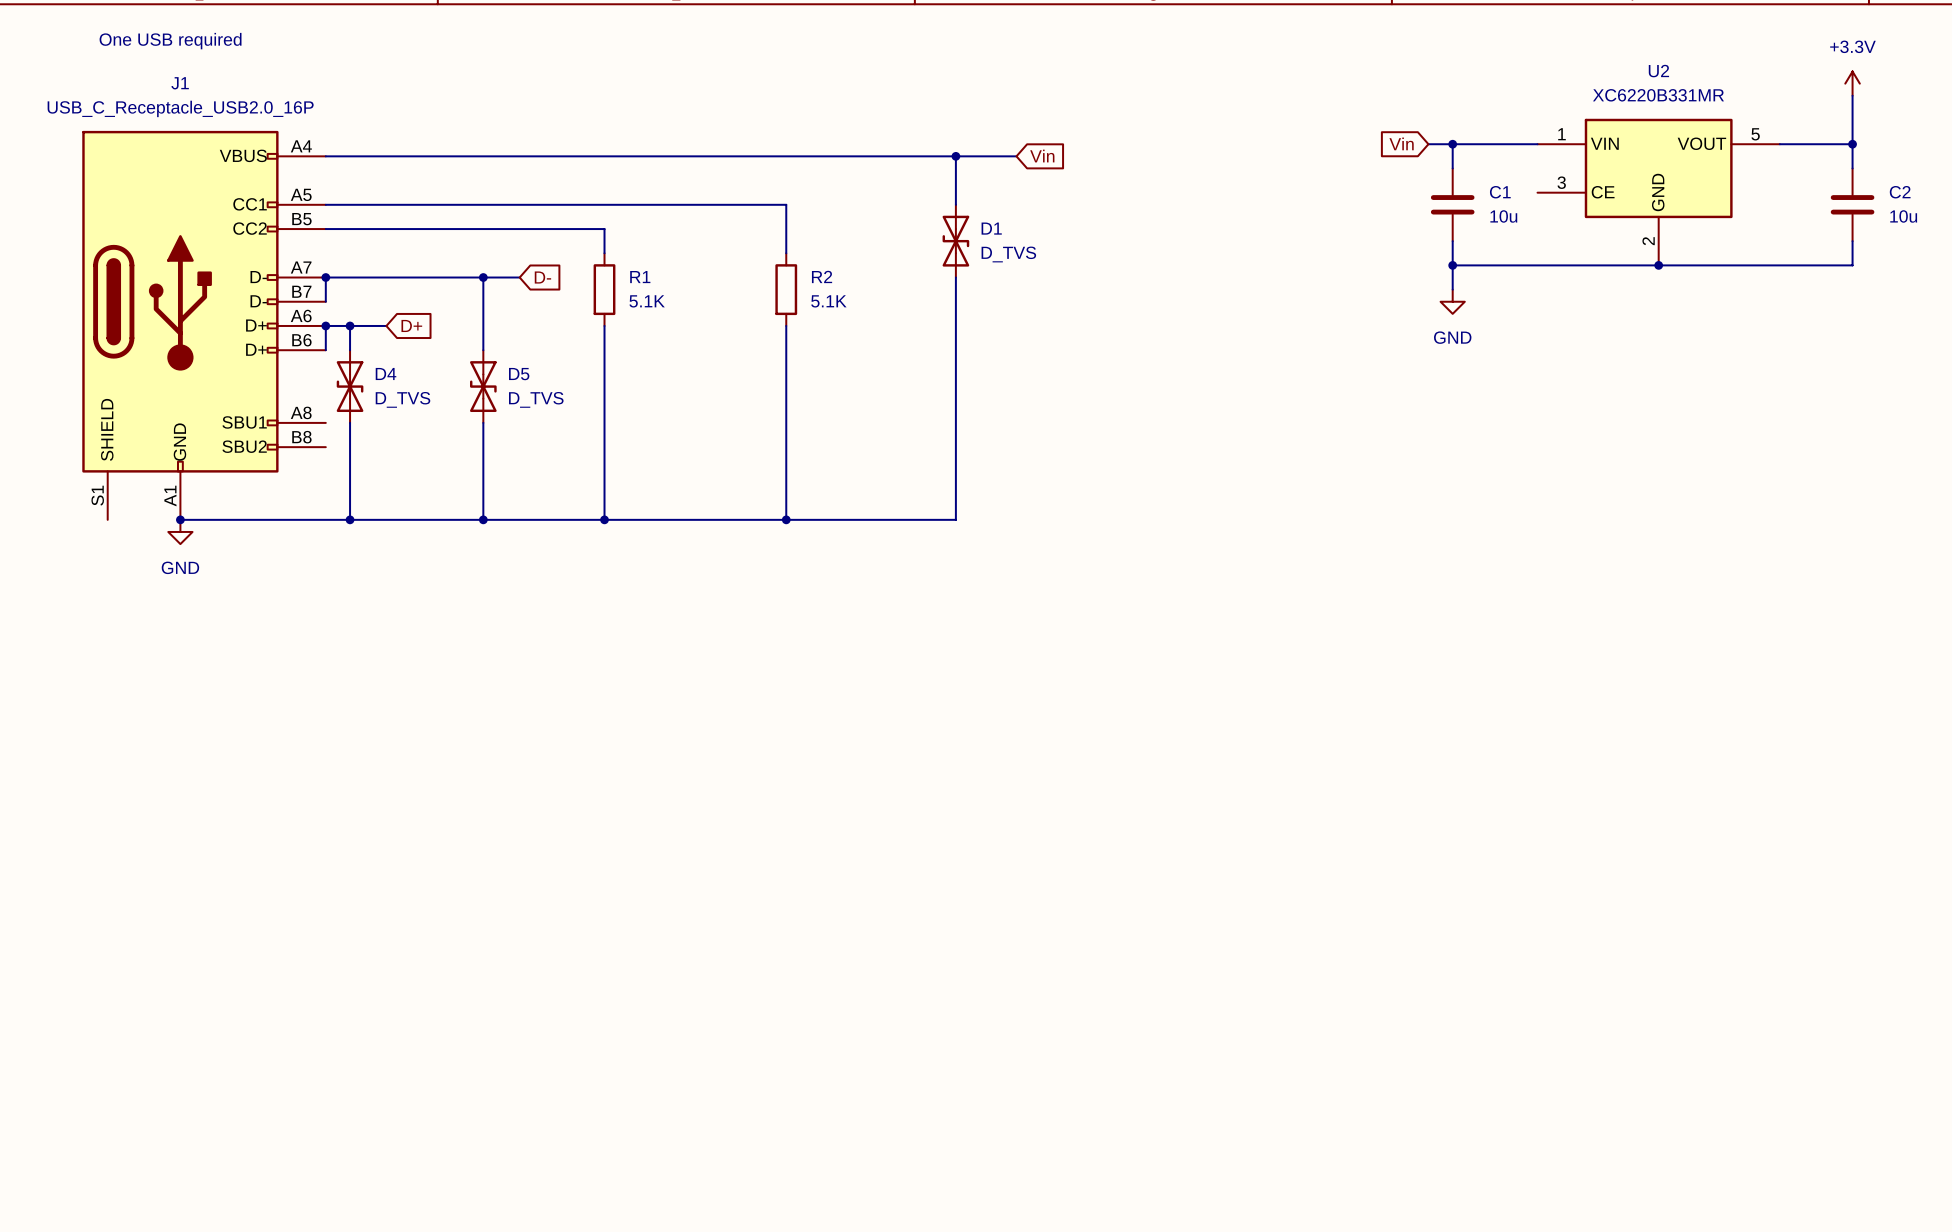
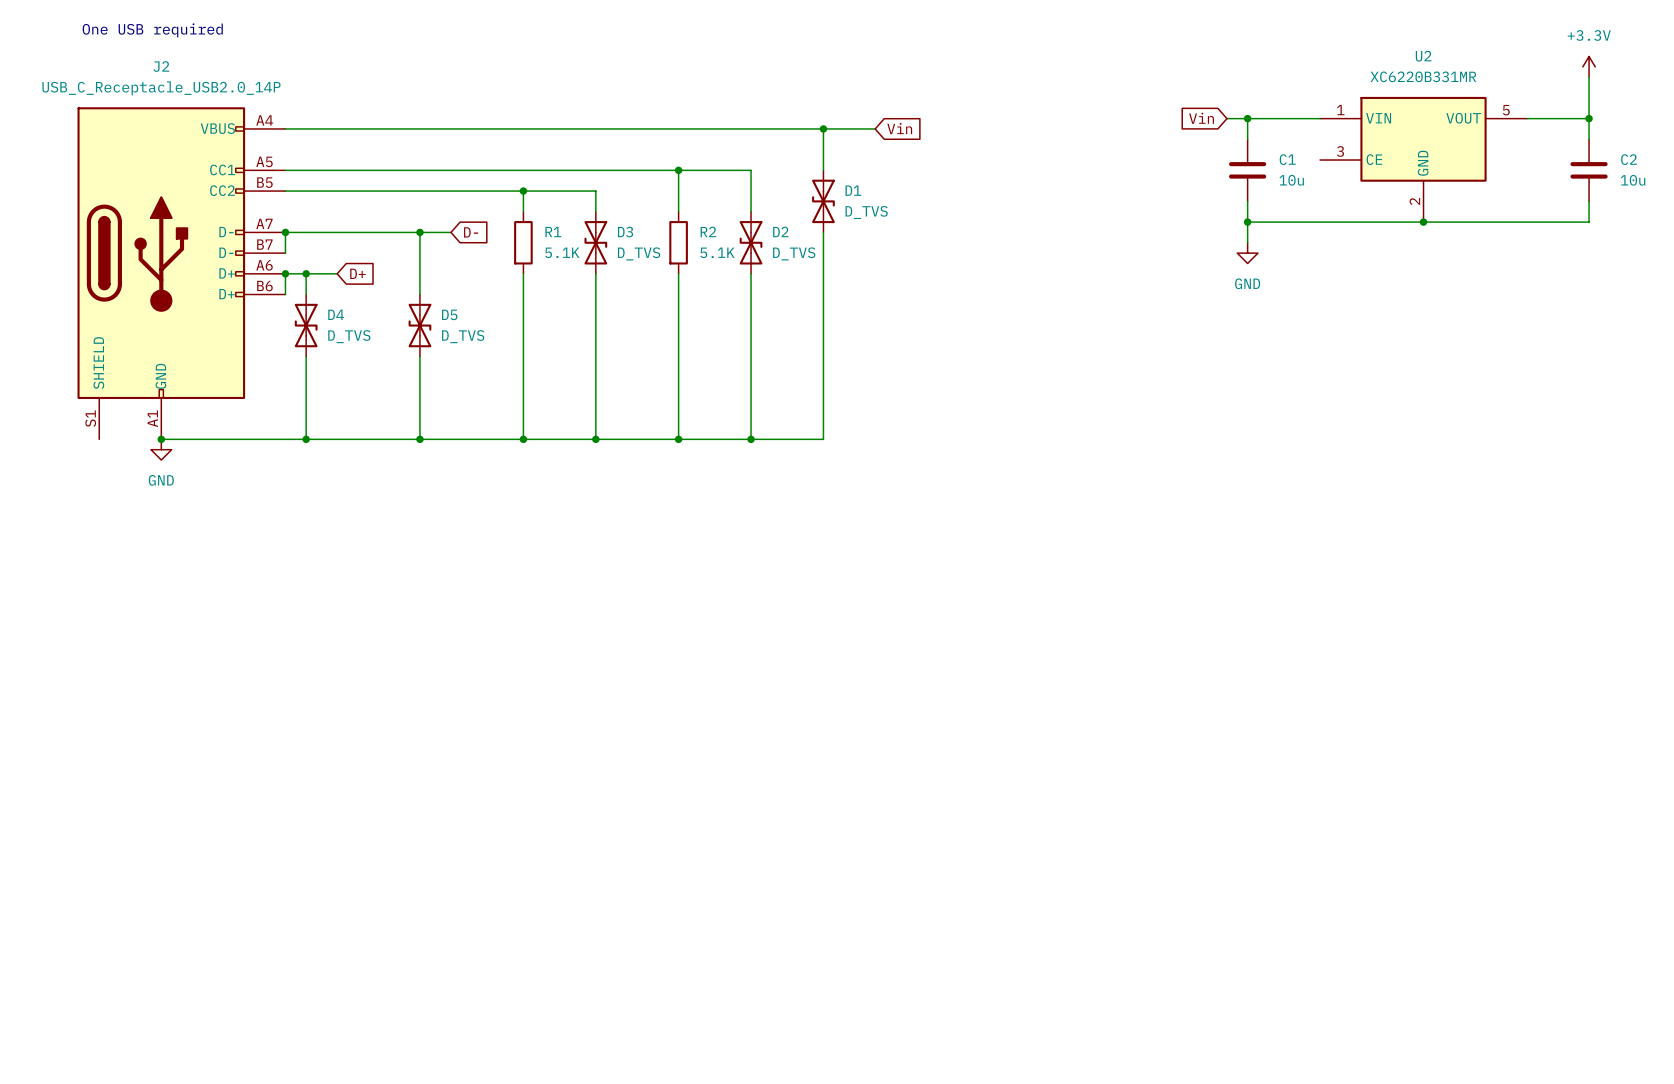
wire: none -> (678, 170) (751, 170) (751, 211)
junction: none -> (678, 170)
wire: none -> (523, 191) (595, 191) (595, 211)
junction: none -> (523, 191)
D3: none -> D_TVS (595, 242)
D2: none -> D_TVS (751, 242)
J1: USB_C_Receptacle_USB2.0_16P (204, 325) -> none
J2: none -> USB_C_Receptacle_USB2.0_14P (181, 273)
wire: none -> (595, 273) (595, 439)
wire: none -> (751, 273) (751, 439)
junction: none -> (595, 439)
junction: none -> (751, 439)

